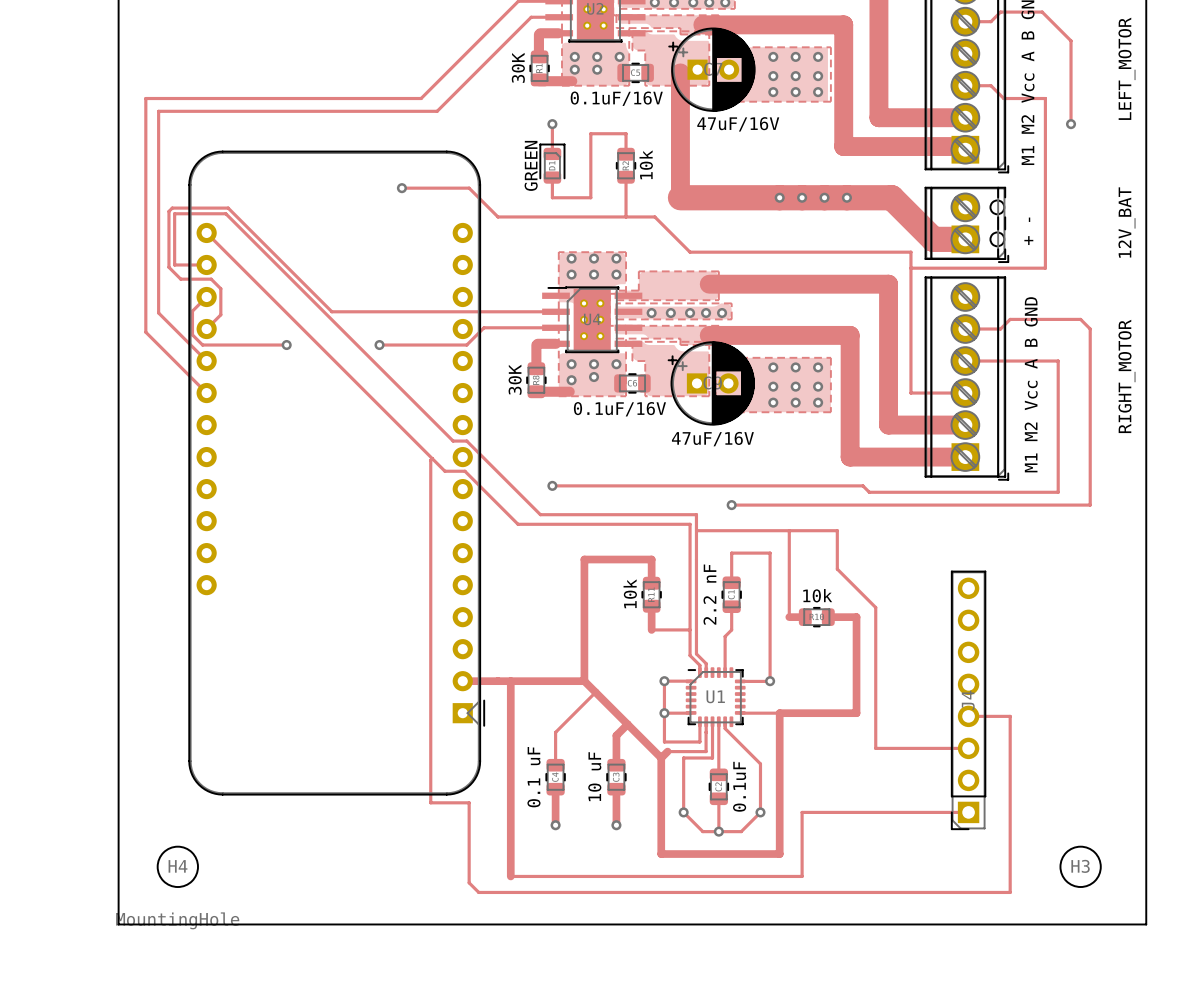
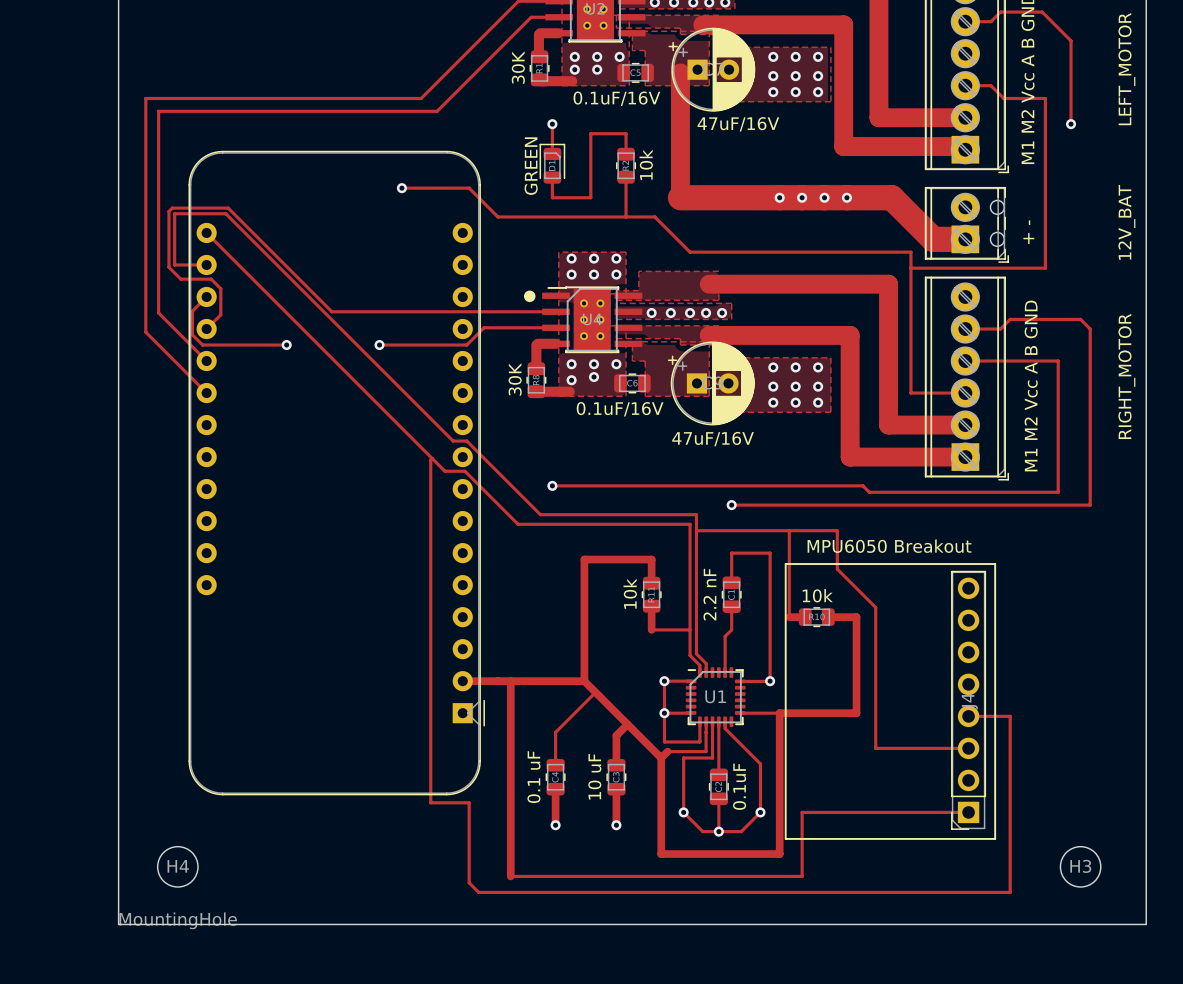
drawing: none -> [523, 290, 536, 303]
text: none -> MPU6050 Breakout (889, 546)
line: none -> (785, 564) (995, 564) (995, 838) (785, 838) (785, 564)

